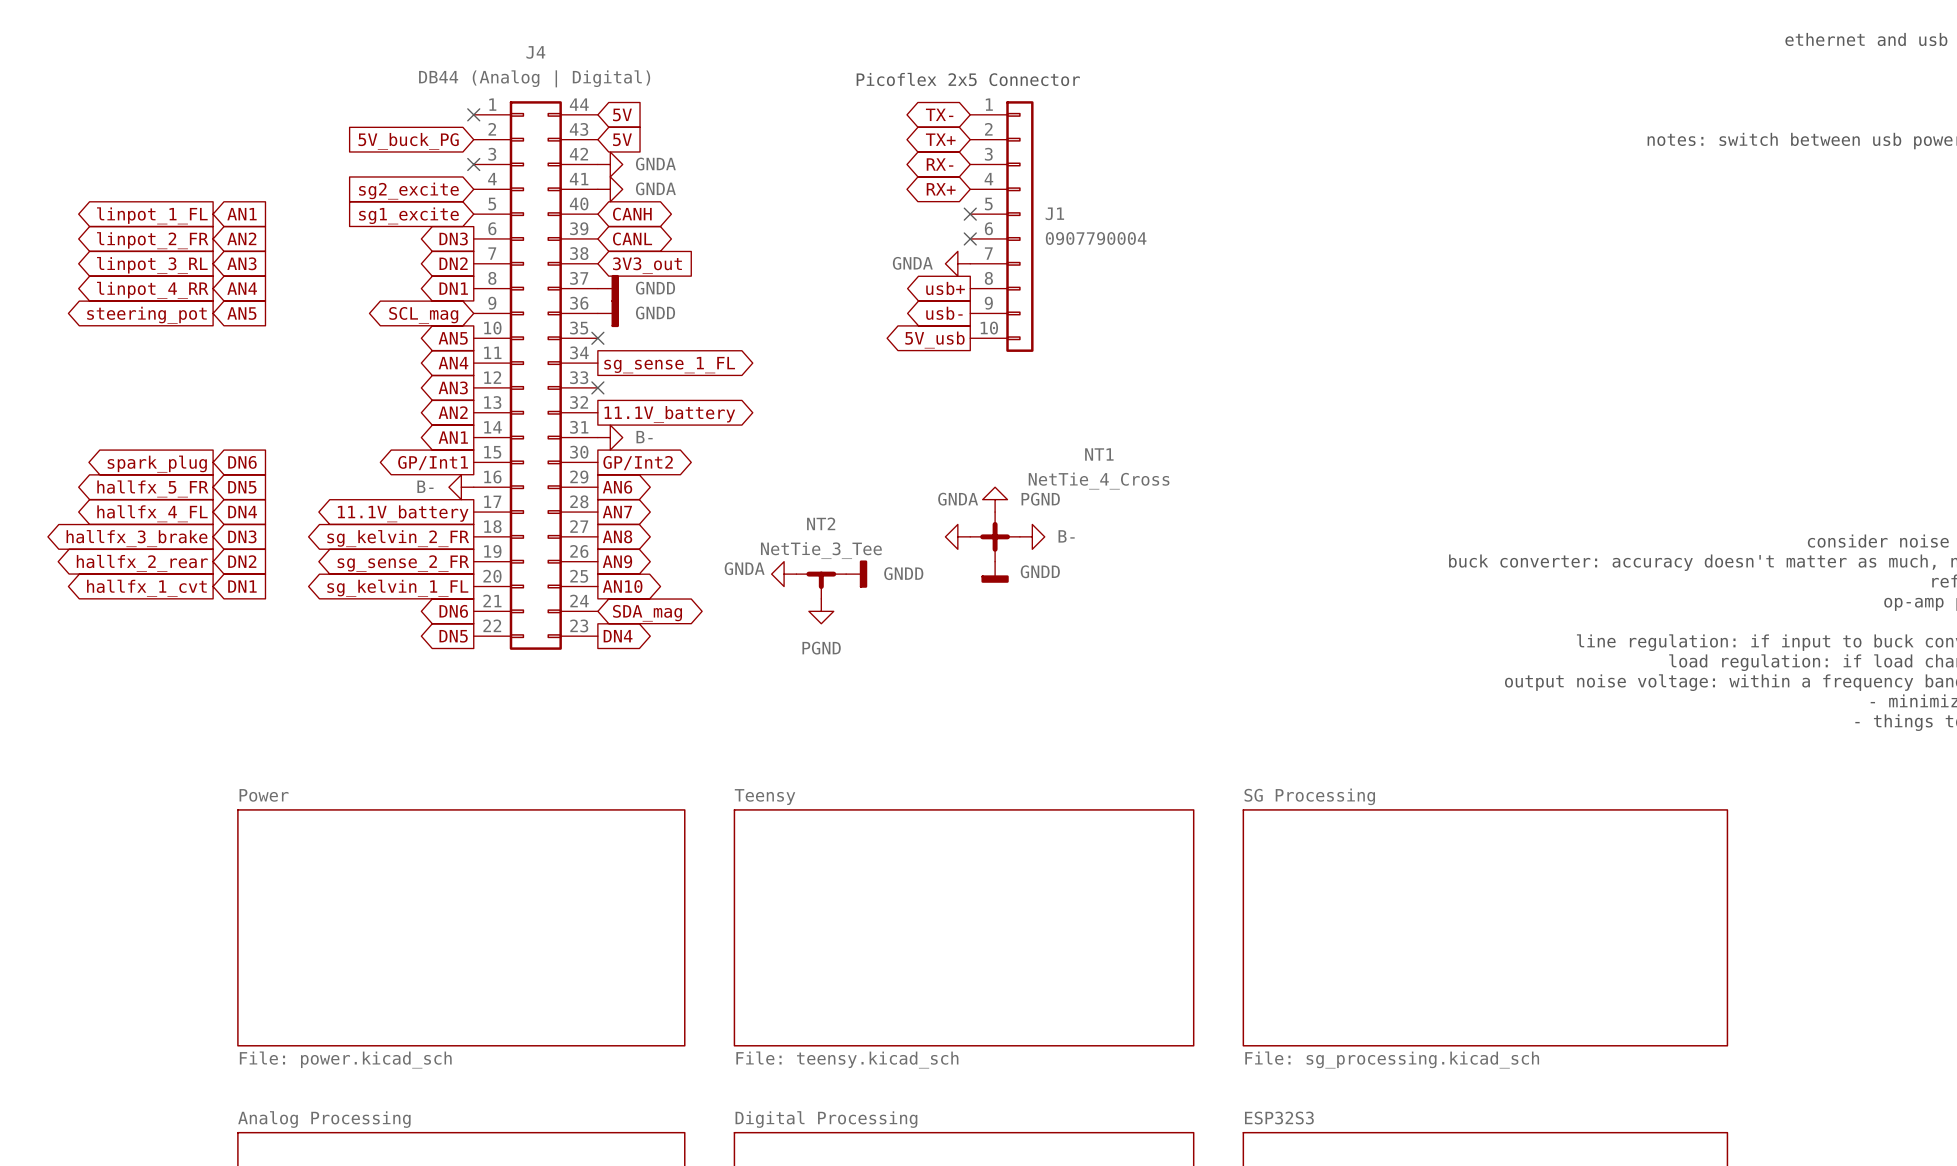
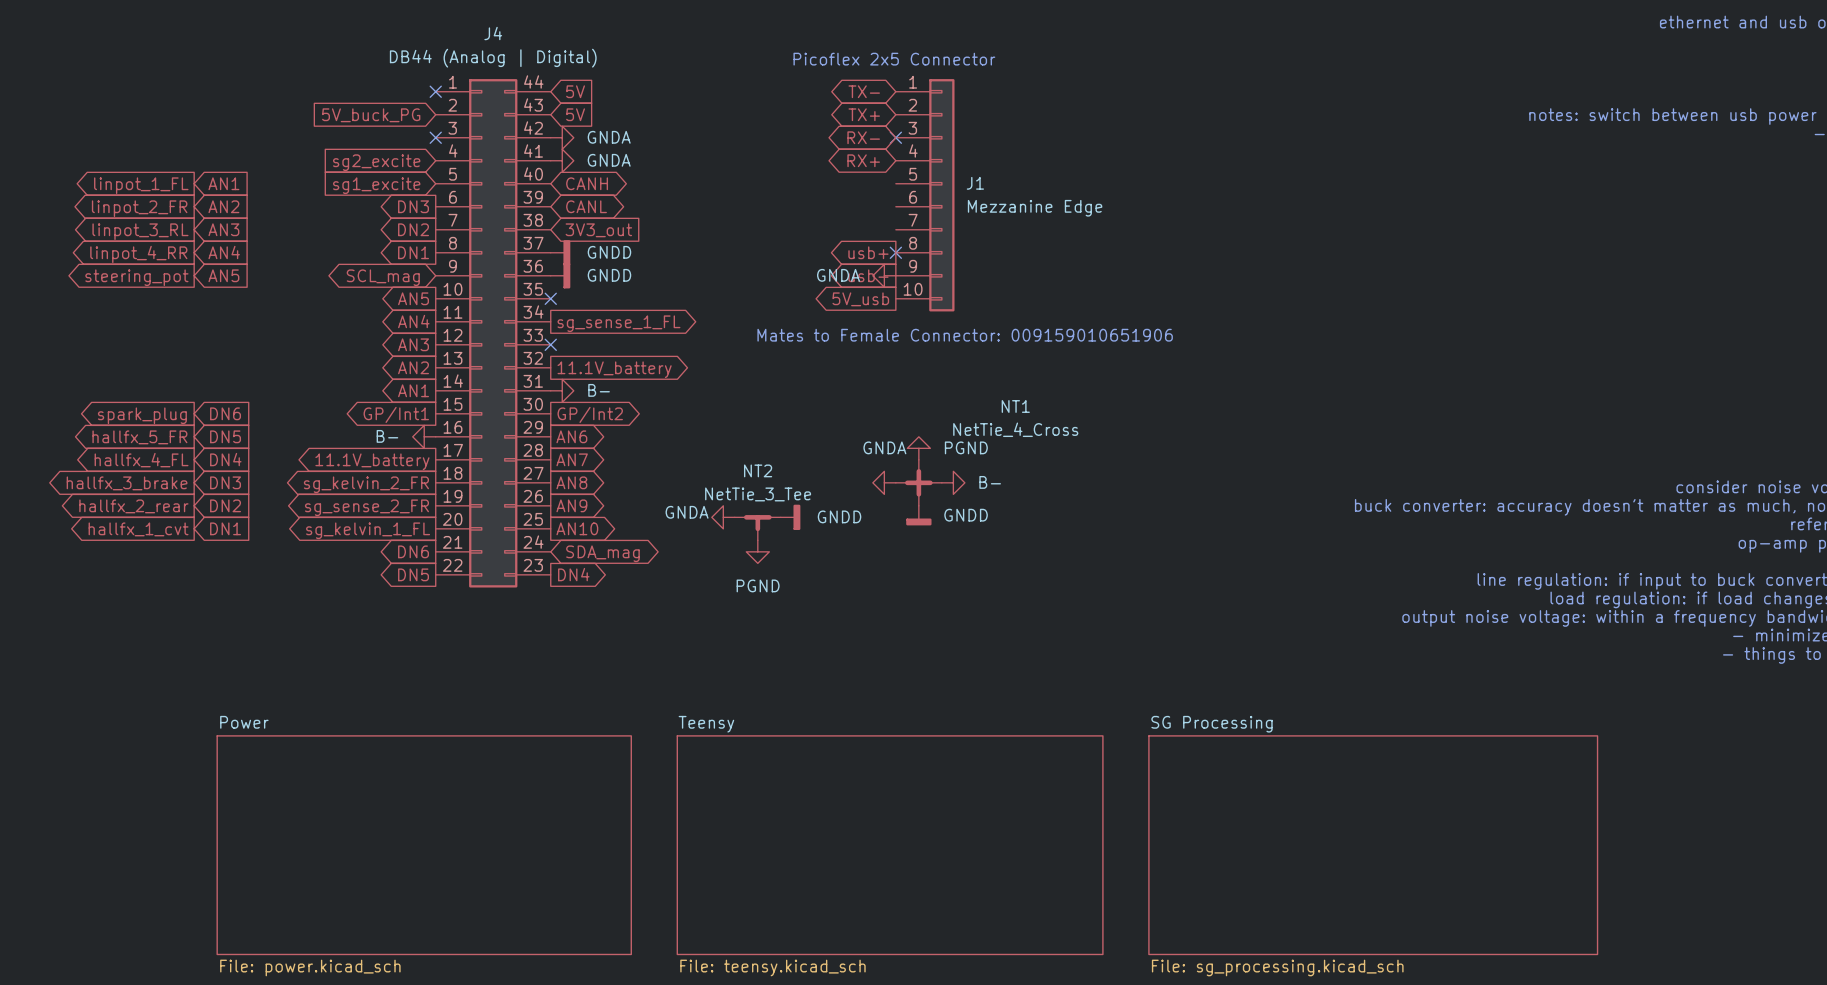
no-connect mark: none -> (895, 137)
no-connect mark: (970, 214) -> none
no-connect mark: (970, 238) -> none
J1 value: 0907790004 (1096, 238) -> Mezzanine Edge (1035, 208)
power symbol position: GNDA (957, 263) -> GNDA (884, 275)
no-connect mark: none -> (895, 252)
text: none -> Mates to Female Connector: 009159010651906 (965, 335)

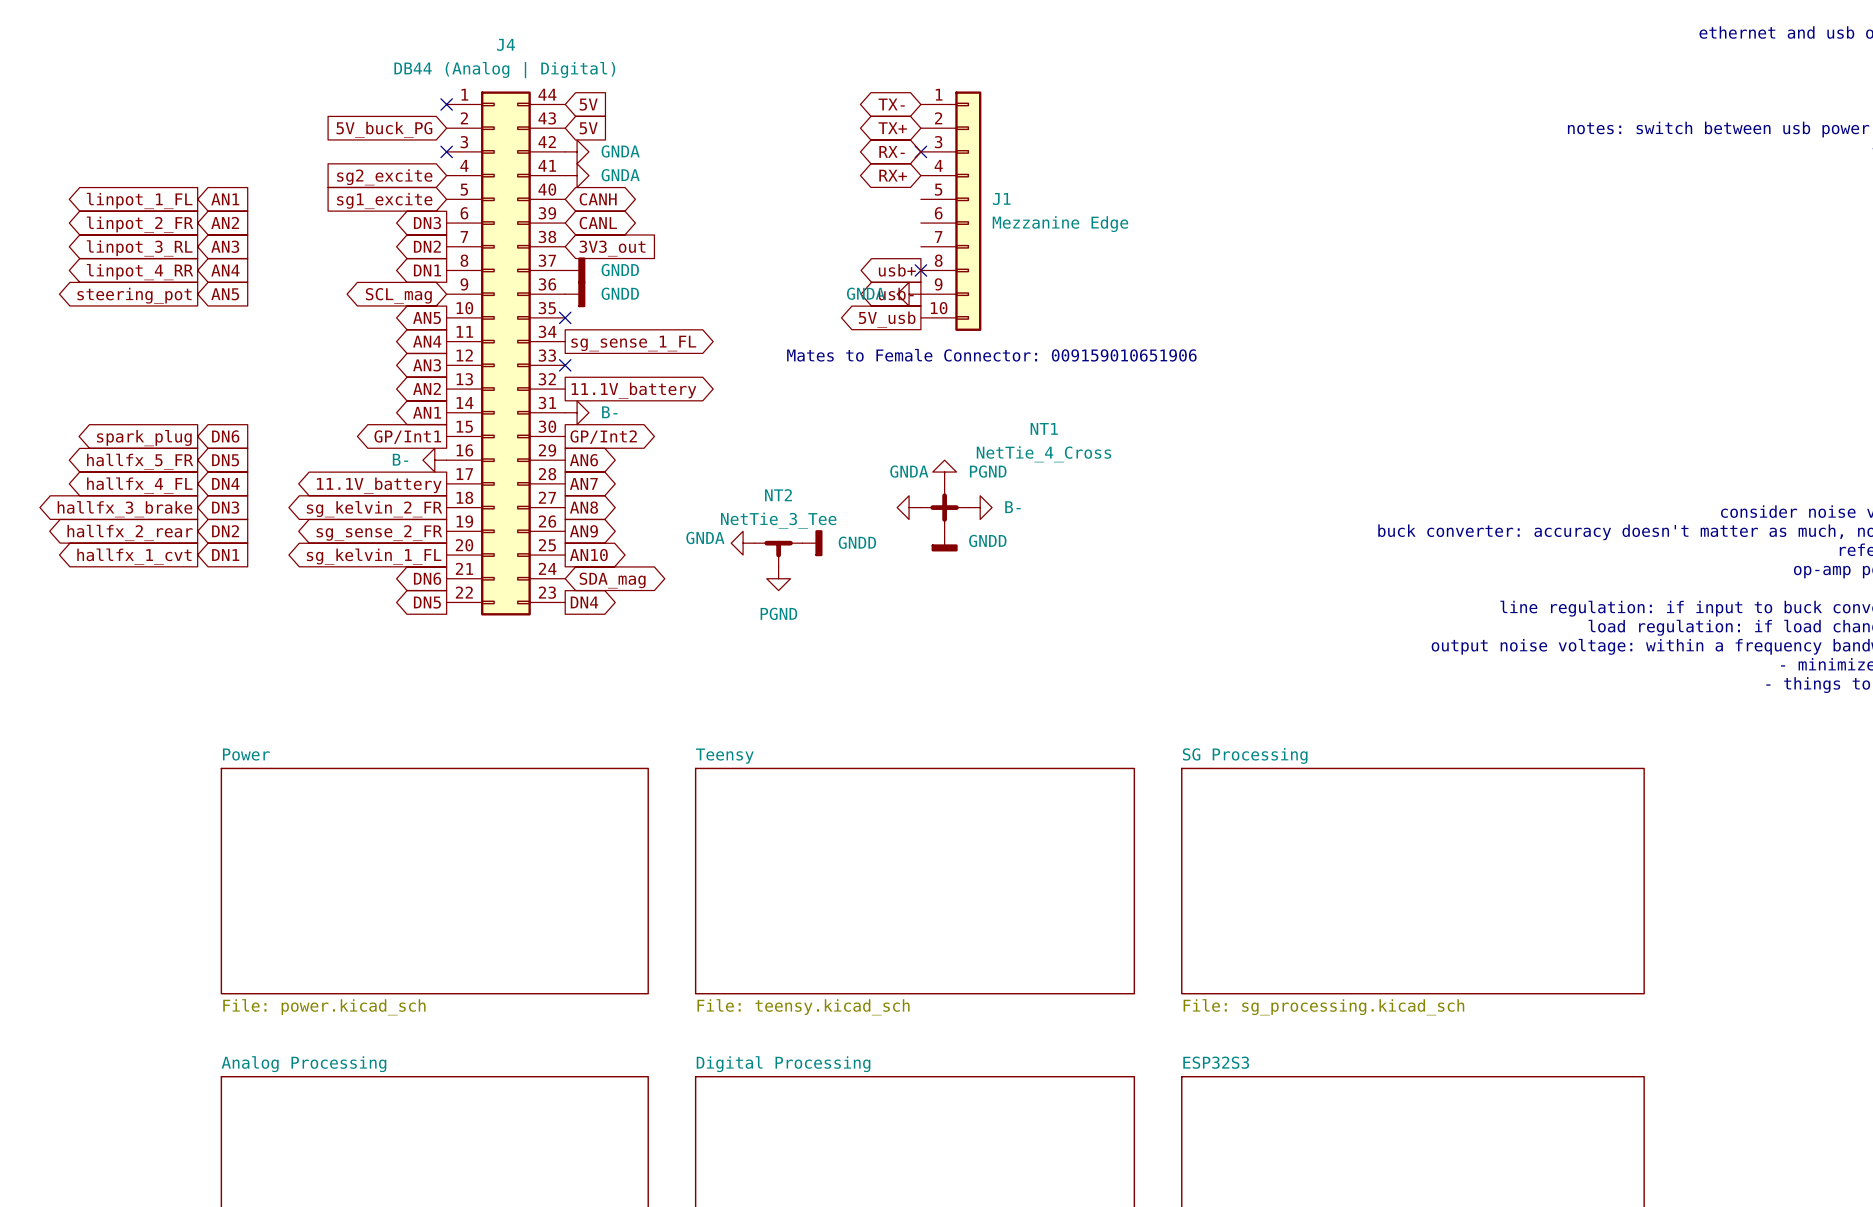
text: Picoflex 2x5 Connector (894, 59) -> none

